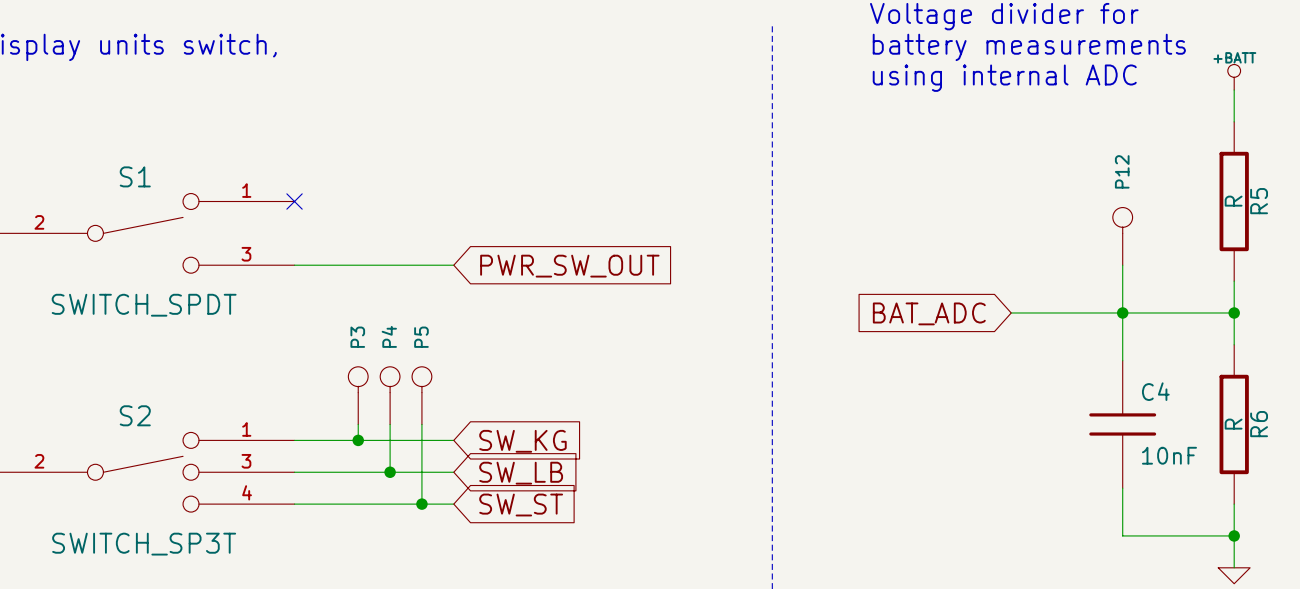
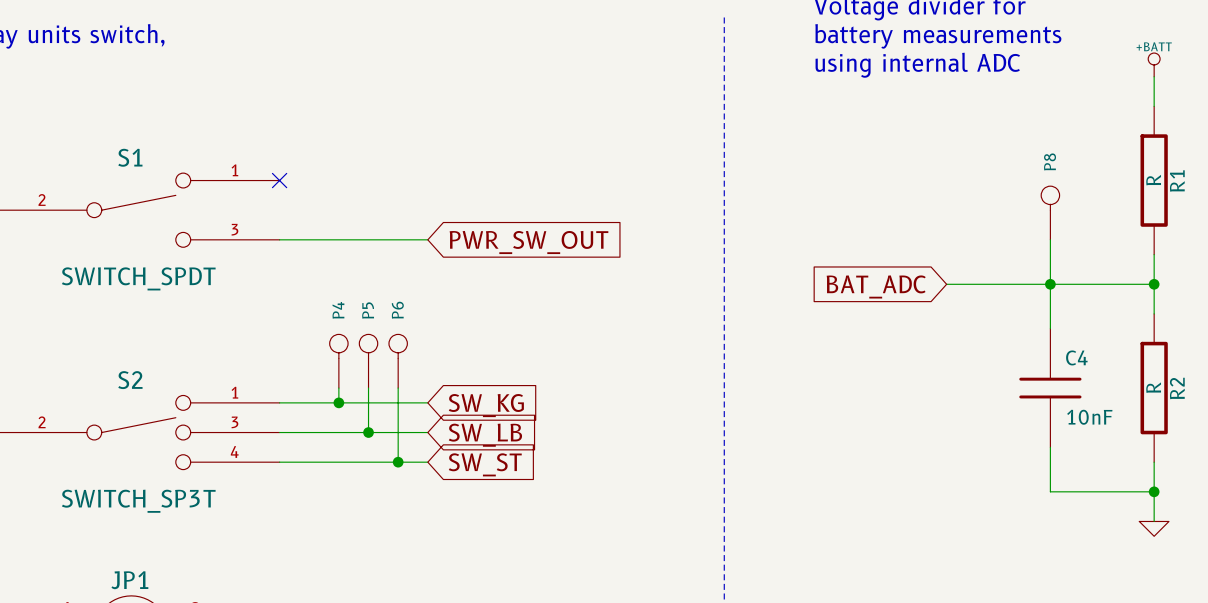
P12 name: P12 (1122, 171) -> P8 (1050, 161)
R5 name: R5 (1259, 201) -> R1 (1177, 181)
P4 name: P4 (389, 336) -> P5 (368, 310)
P3 name: P3 (357, 337) -> P4 (338, 310)
P5 name: P5 (421, 337) -> P6 (397, 310)
R6 name: R6 (1259, 424) -> R2 (1177, 388)

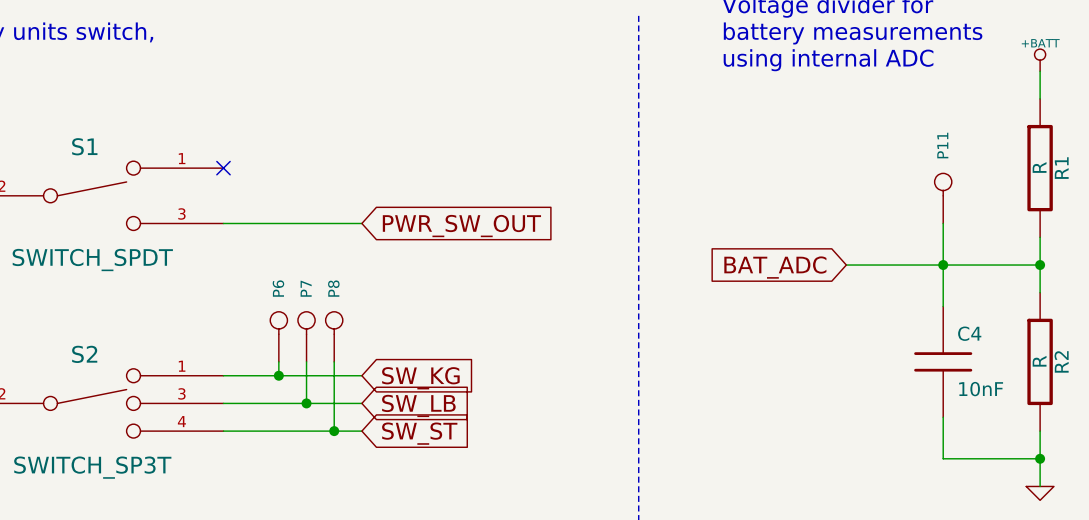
P8 name: P8 (1050, 161) -> P11 (942, 145)
P4 name: P4 (338, 310) -> P6 (278, 288)
P5 name: P5 (368, 310) -> P7 (306, 288)
P6 name: P6 (397, 310) -> P8 (333, 288)

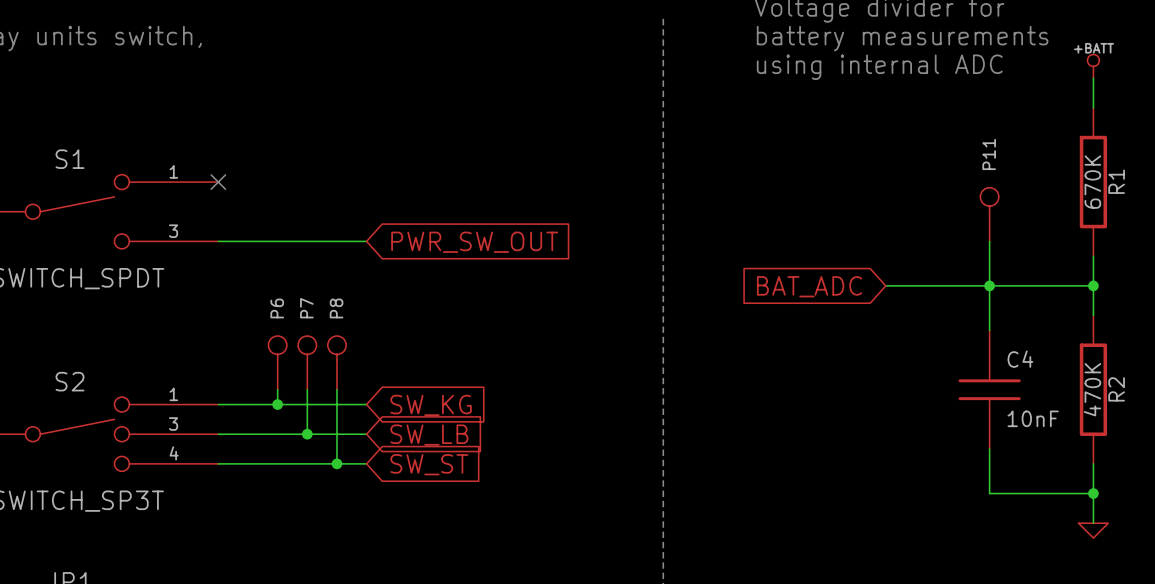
R1 value: R (1039, 167) -> 670K (1092, 182)
R2 value: R (1039, 361) -> 470K (1092, 389)

